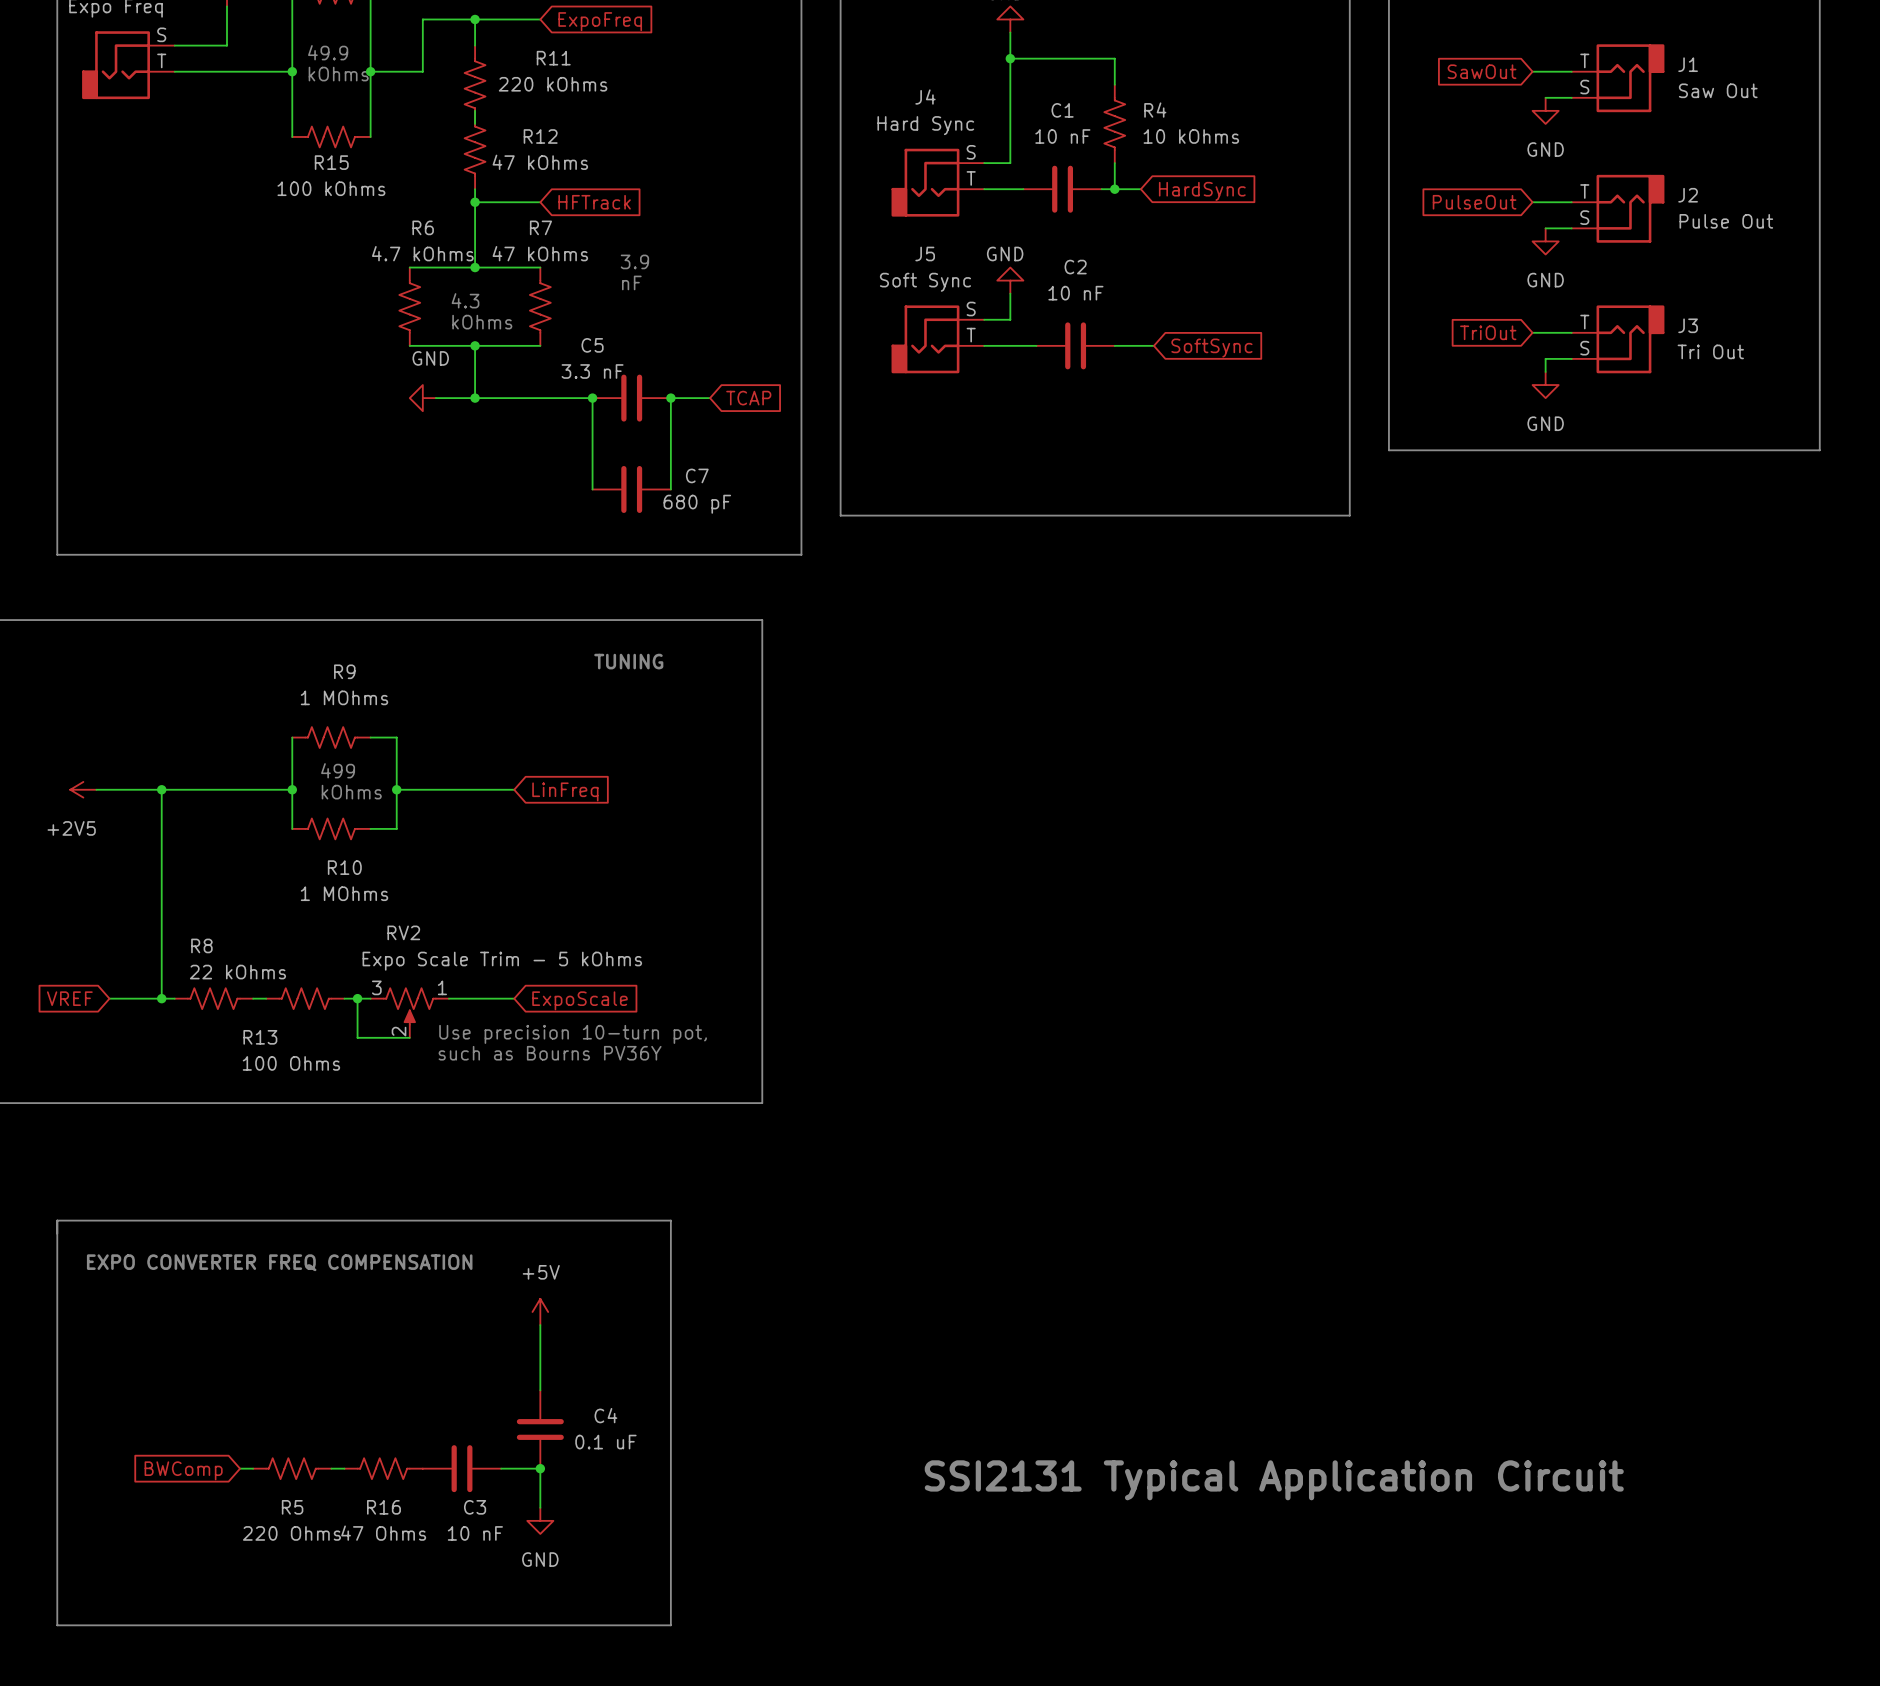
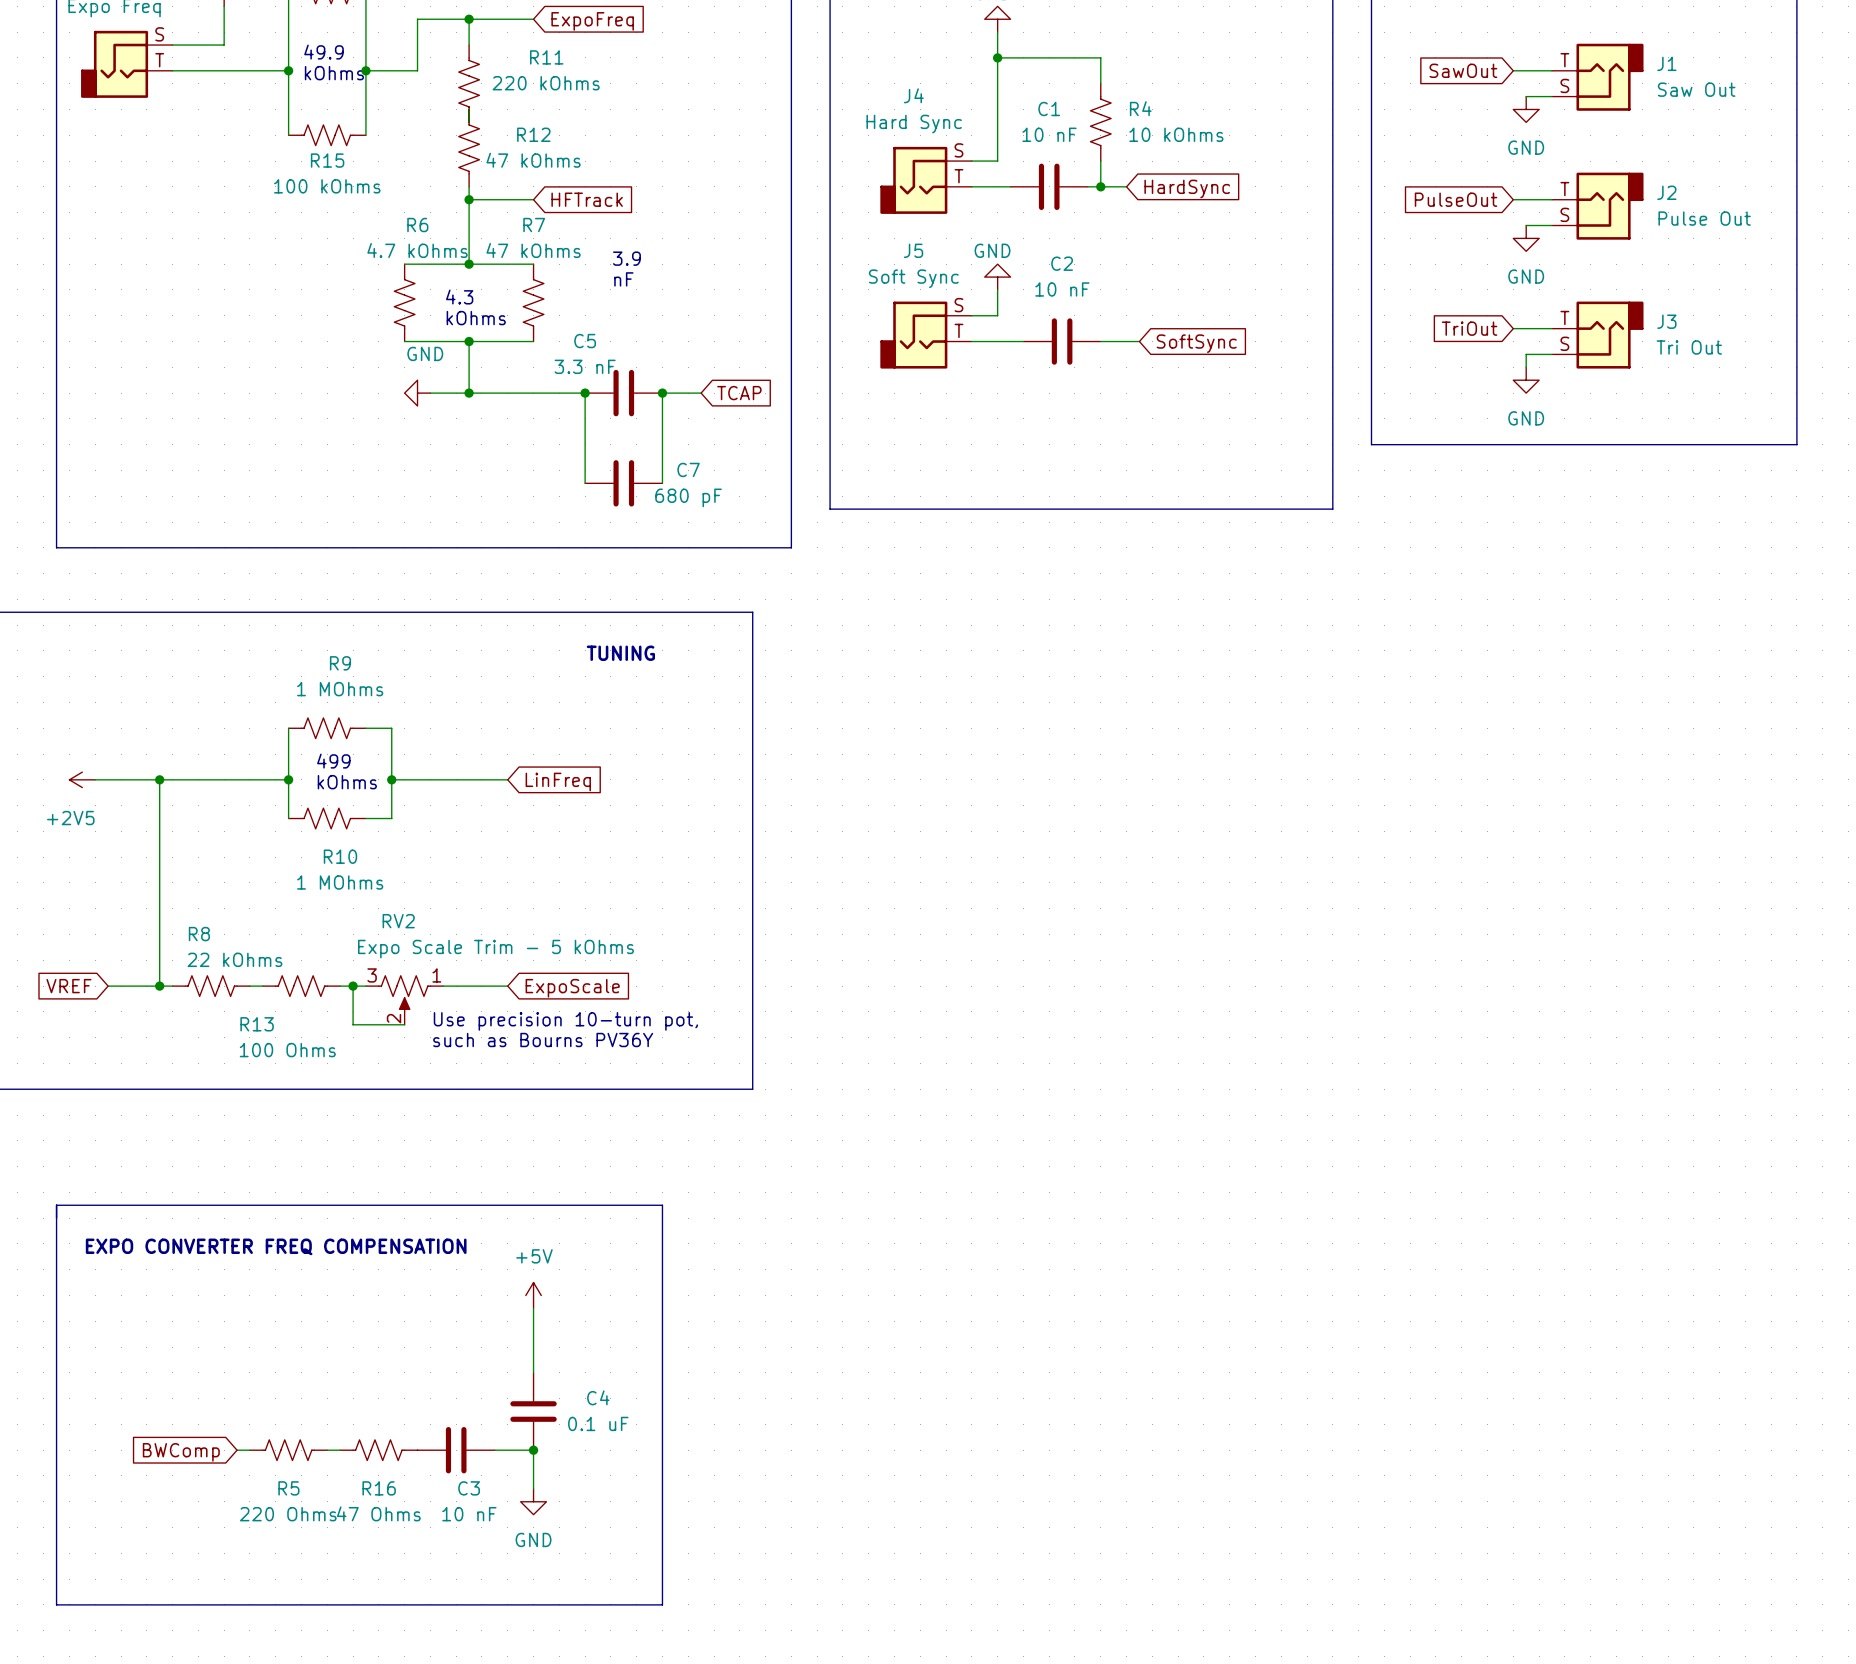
text: SSI2131 Typical Application Circuit (1274, 1480) -> none

